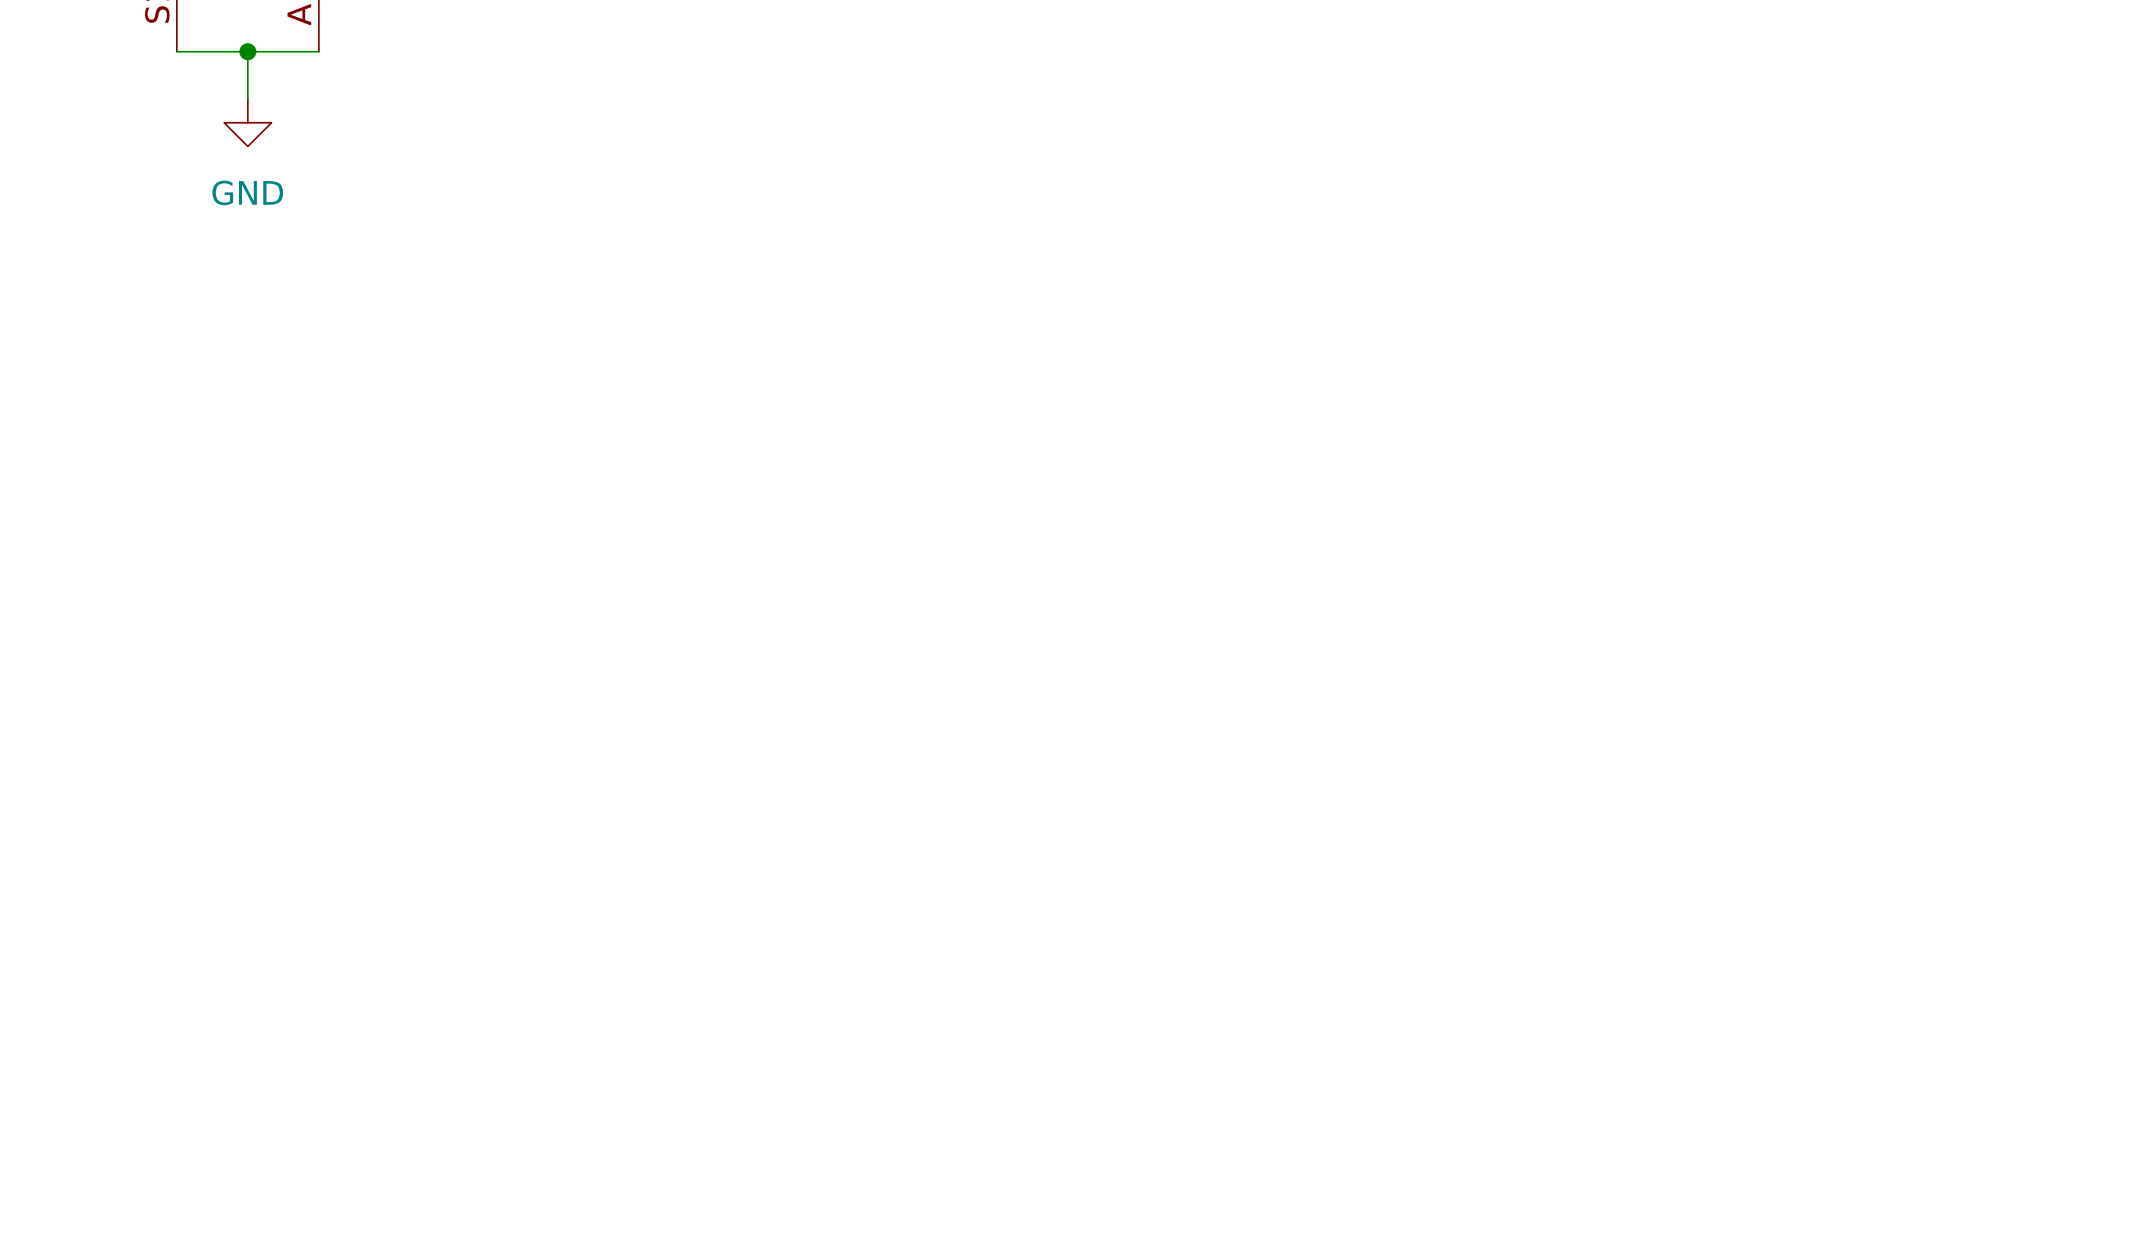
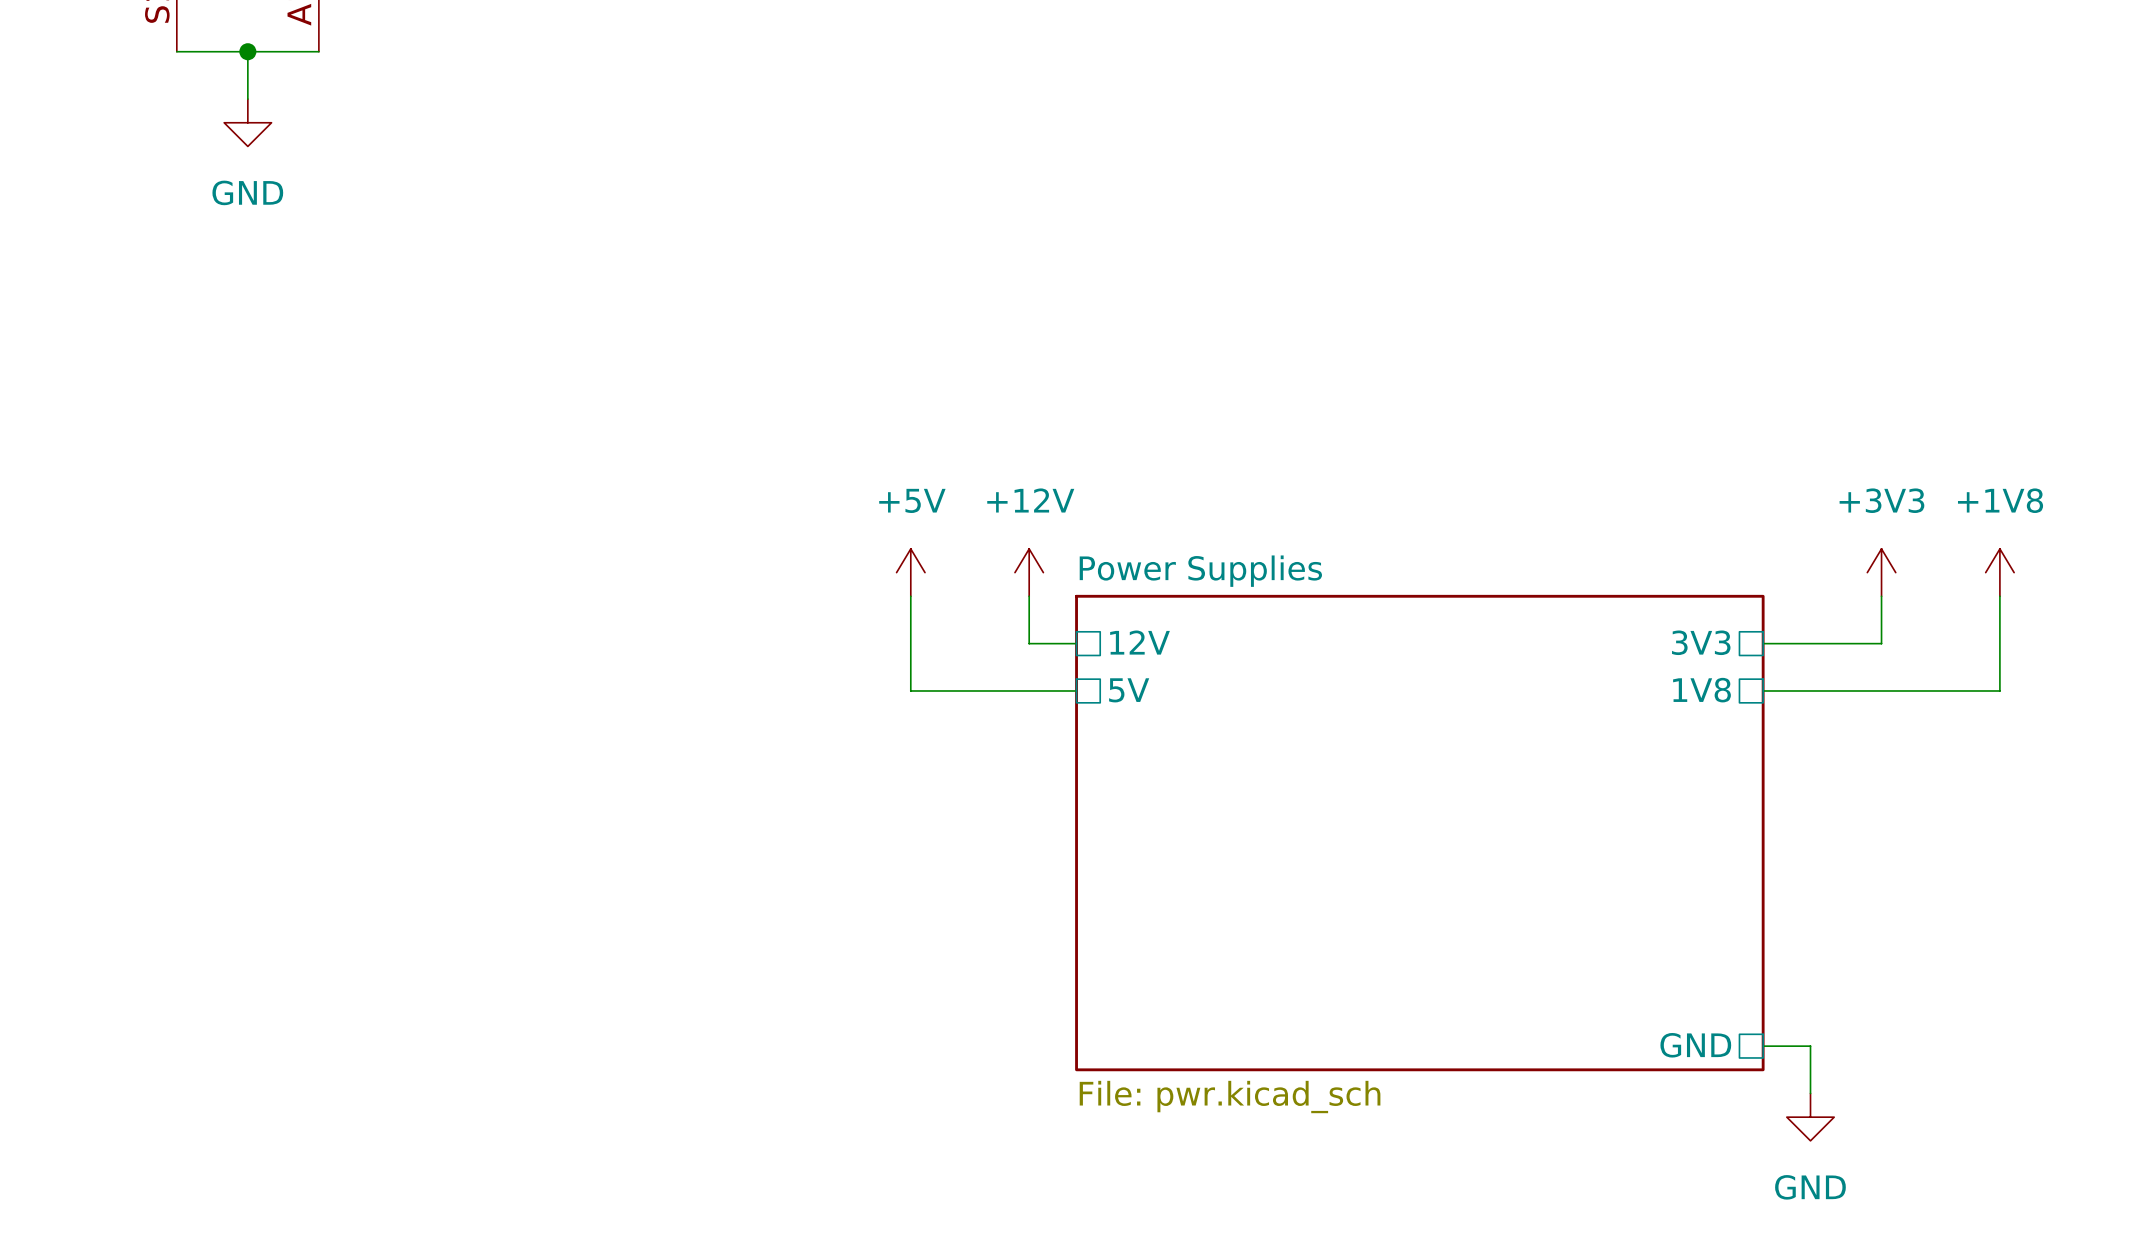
power symbol: none -> +5V (910, 572)
power symbol: none -> +12V (1029, 572)
power symbol: none -> +3V3 (1881, 572)
power symbol: none -> +1V8 (1999, 572)
wire: none -> (910, 596) (910, 690) (1076, 690)
wire: none -> (1029, 596) (1029, 643) (1076, 643)
wire: none -> (1881, 596) (1881, 643) (1763, 643)
wire: none -> (1999, 596) (1999, 690) (1763, 690)
sheet pin: none -> 12V (1140, 642)
sheet pin: none -> 3V3 (1701, 642)
sheet pin: none -> 5V (1129, 690)
sheet pin: none -> 1V8 (1701, 690)
sheet Power Supplies: none -> File: pwr.kicad_sch (1419, 833)
sheet pin: none -> GND (1695, 1045)
wire: none -> (1763, 1046) (1810, 1046) (1810, 1093)
power symbol: none -> GND (1810, 1117)

